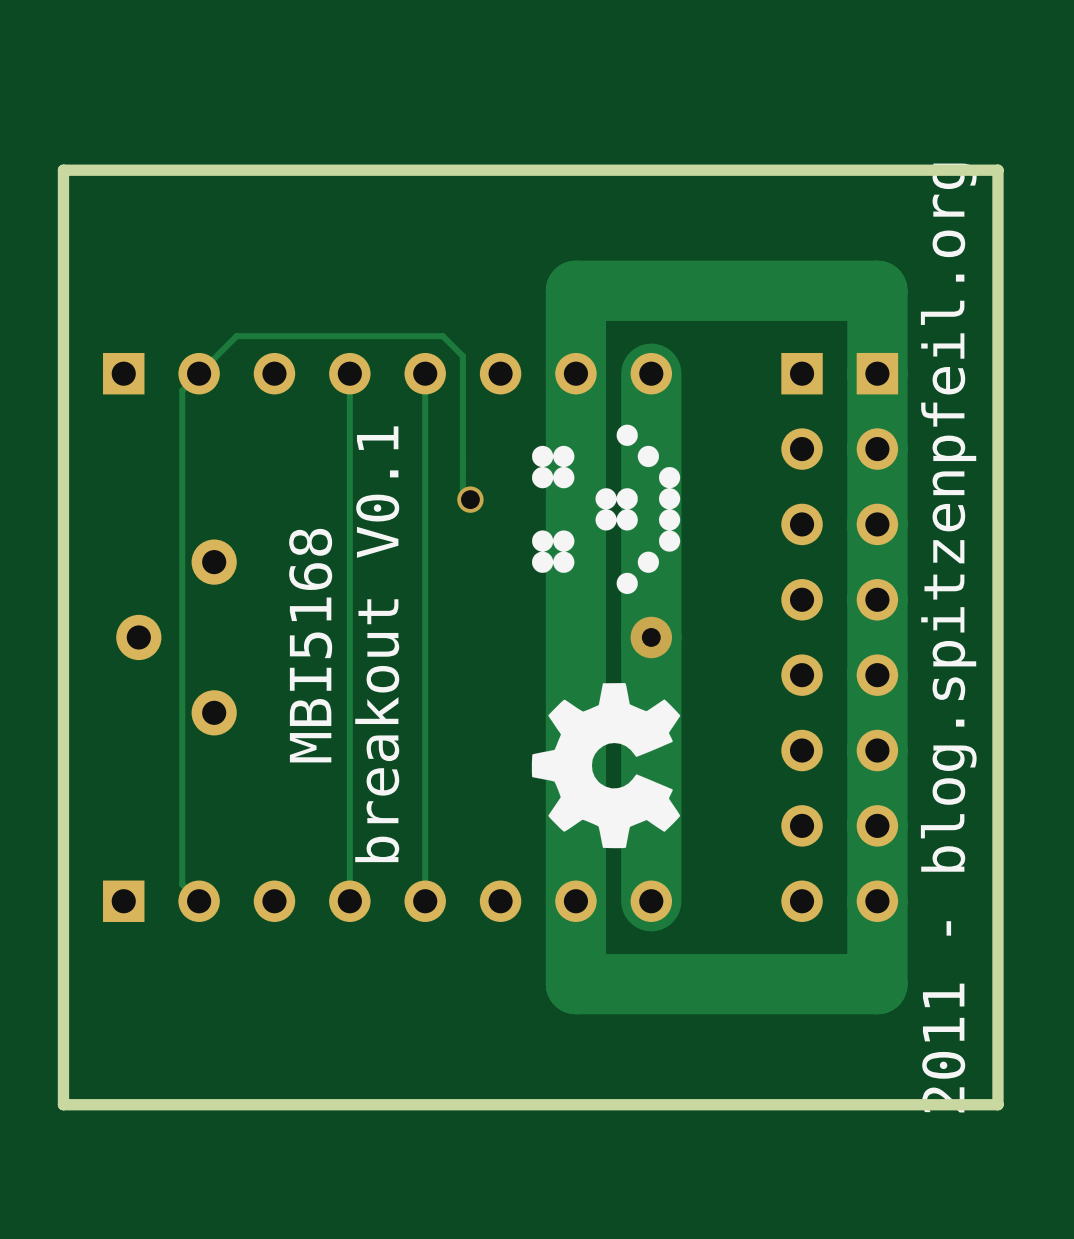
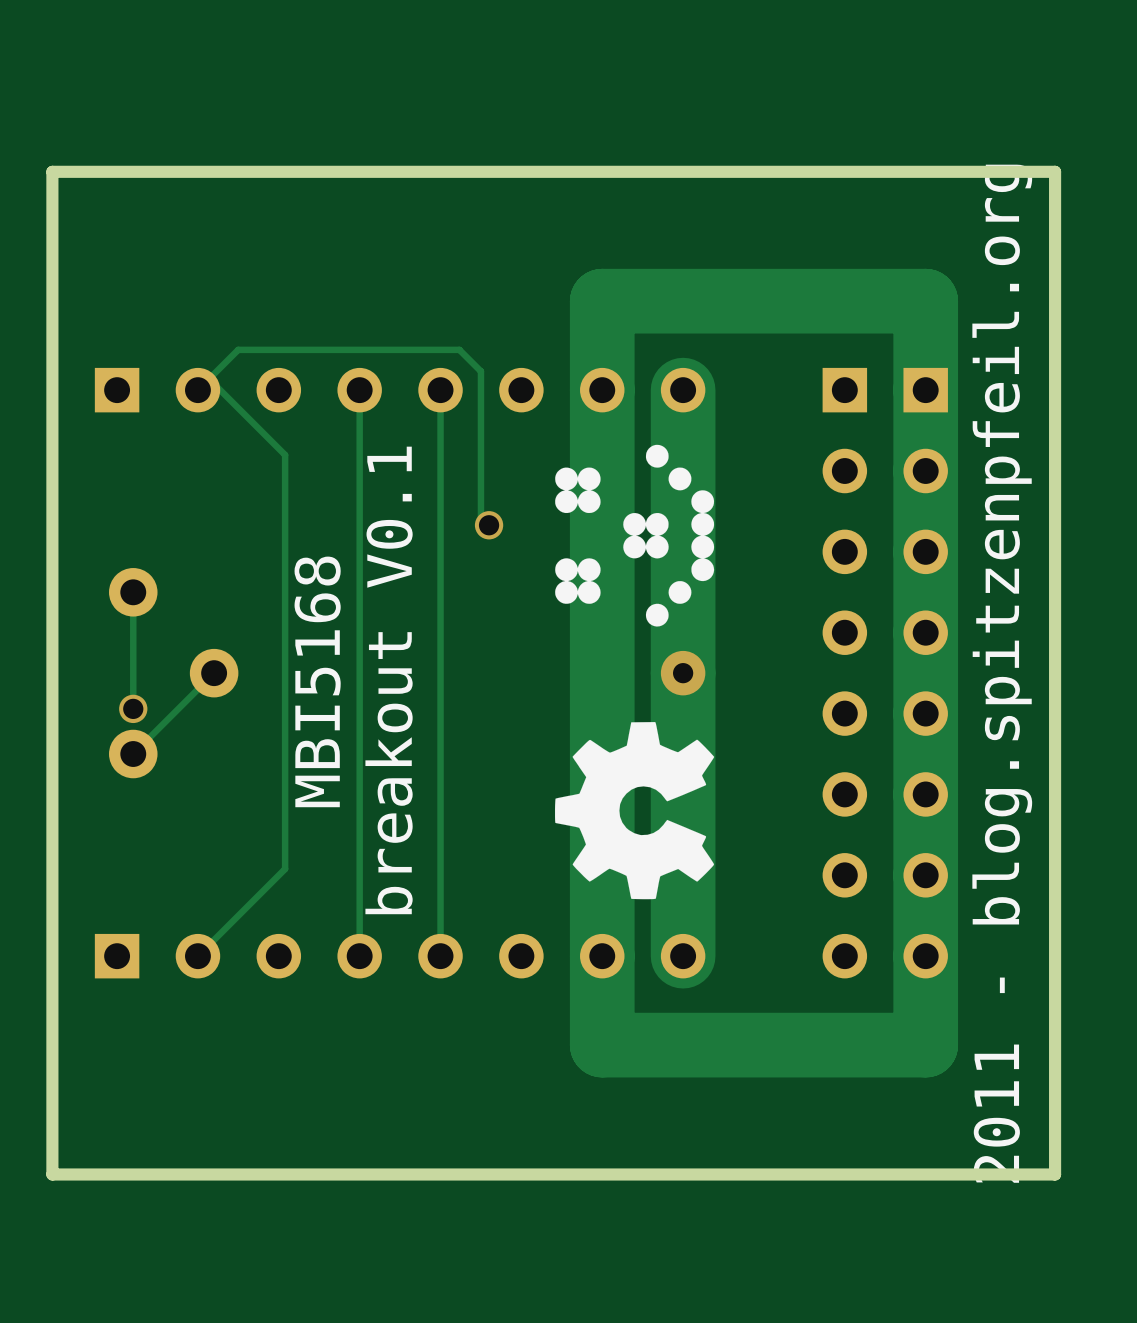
track: (199, 373) (182, 390) (182, 884) (199, 901) -> (209, 378) (285, 454) (285, 869) (197, 956)
track: none -> (133, 592) (133, 708)
part rotation: 0° (176, 637) -> 180° (173, 673)
track: none -> (214, 673) (133, 754)
via: none -> (133, 708)

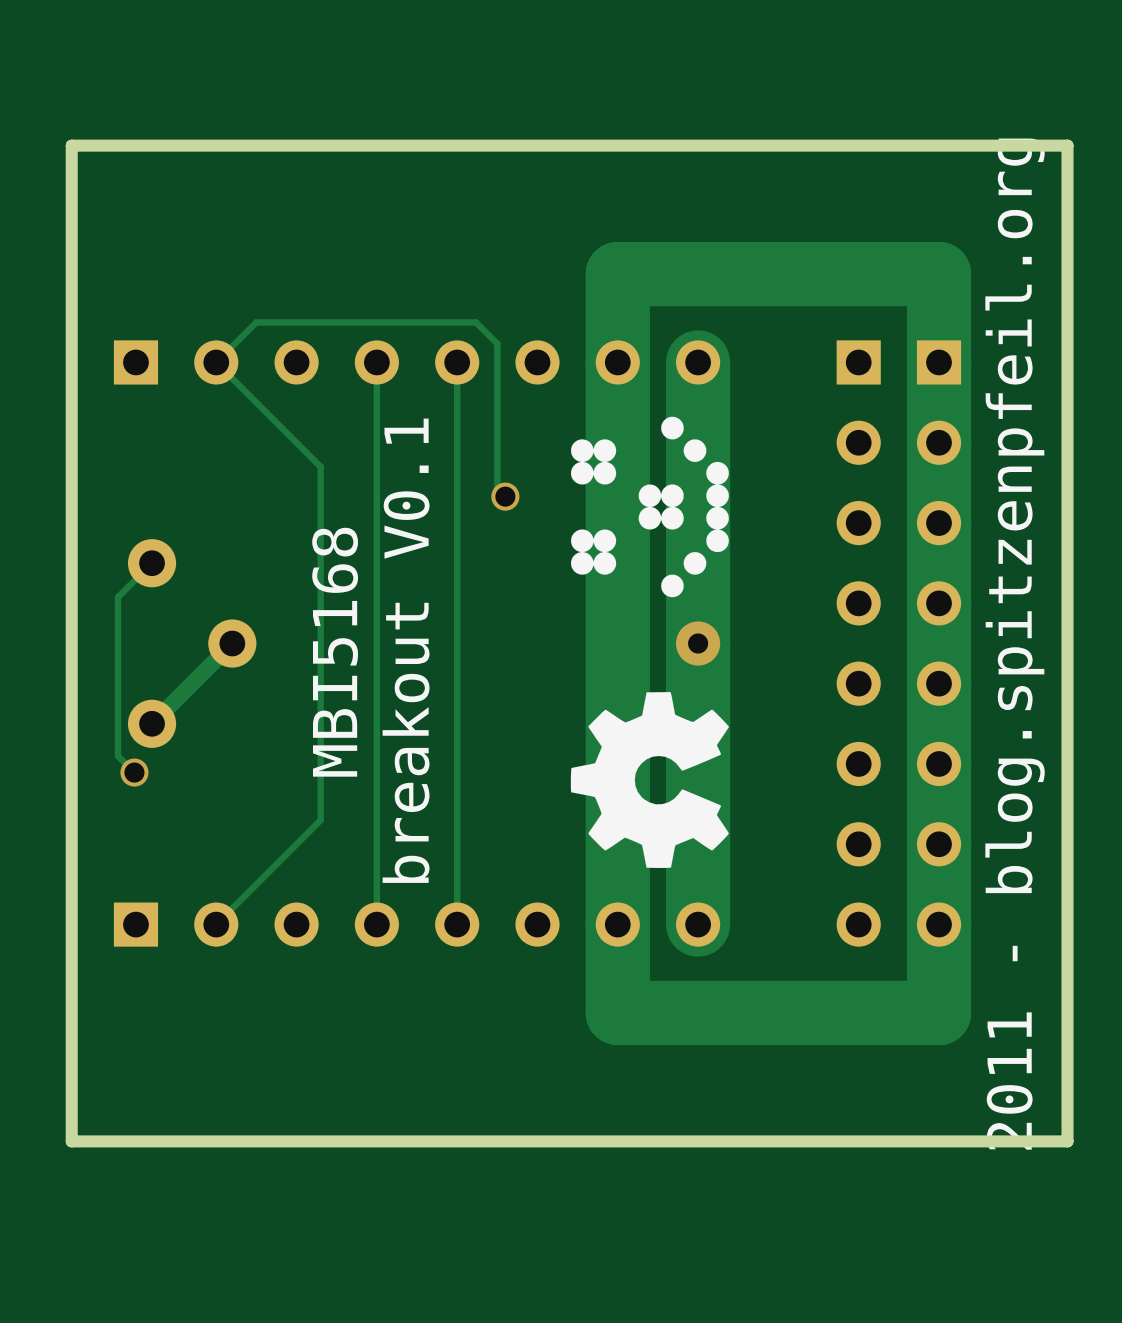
track: (209, 378) (285, 454) (285, 869) -> (216, 362) (320, 466) (320, 820) (302, 838)
track: (133, 592) (133, 708) -> (152, 563) (117, 597) (117, 756) (134, 772)
track width: thin (214, 673) (133, 754) -> thick (232, 643) (152, 723)
via position: (133, 708) -> (134, 772)

